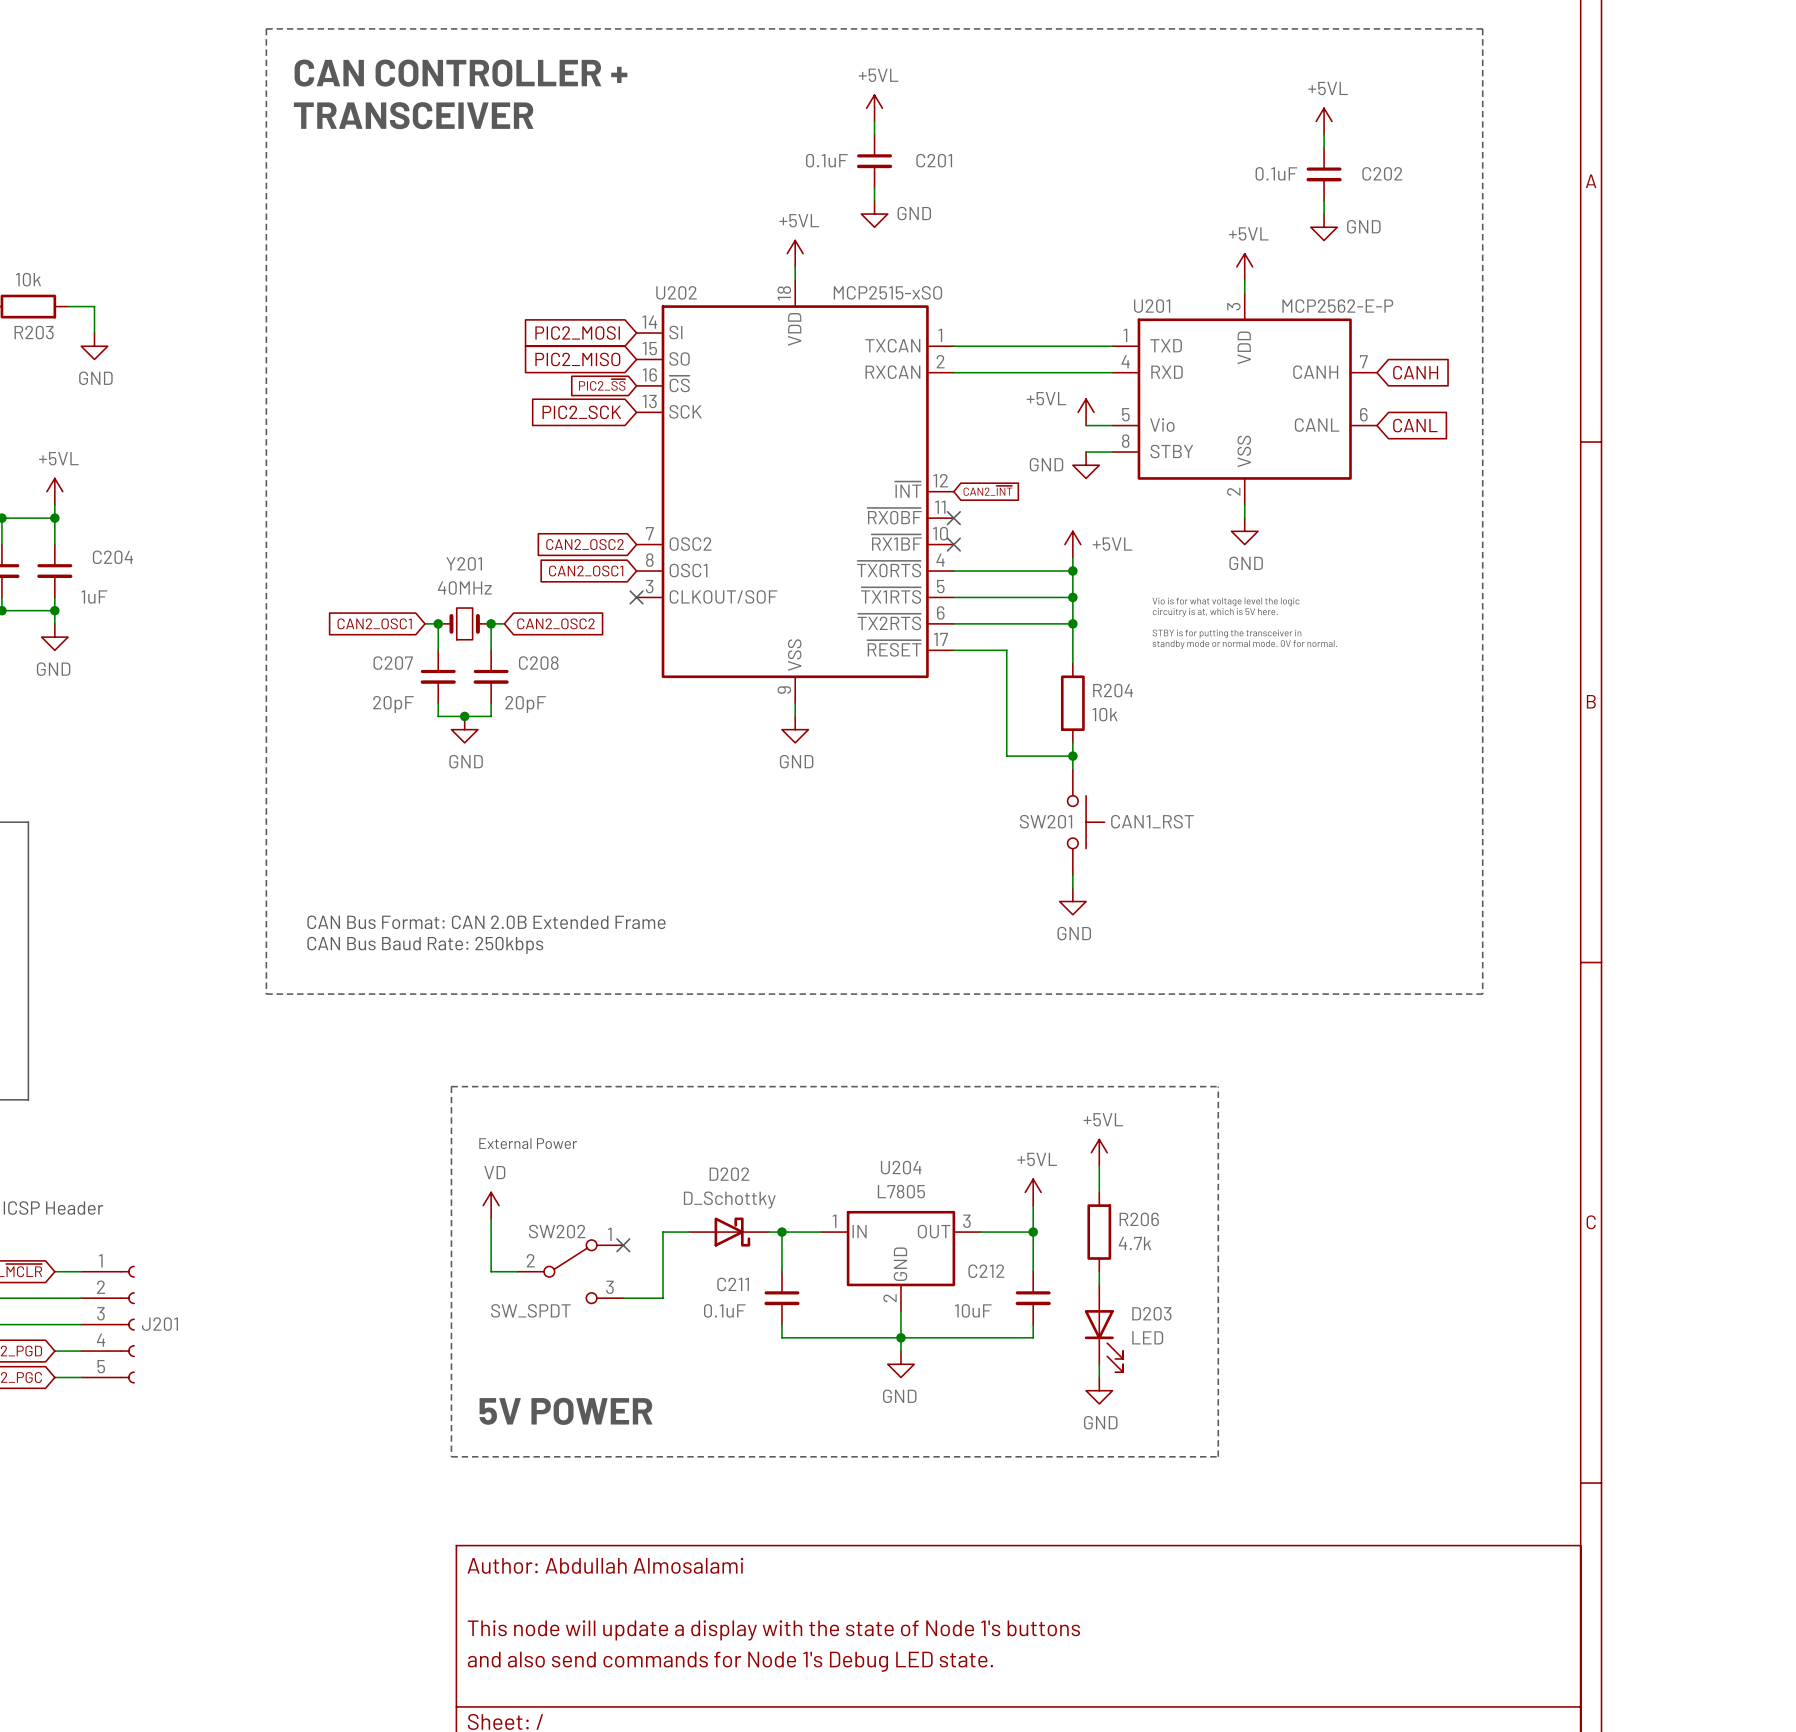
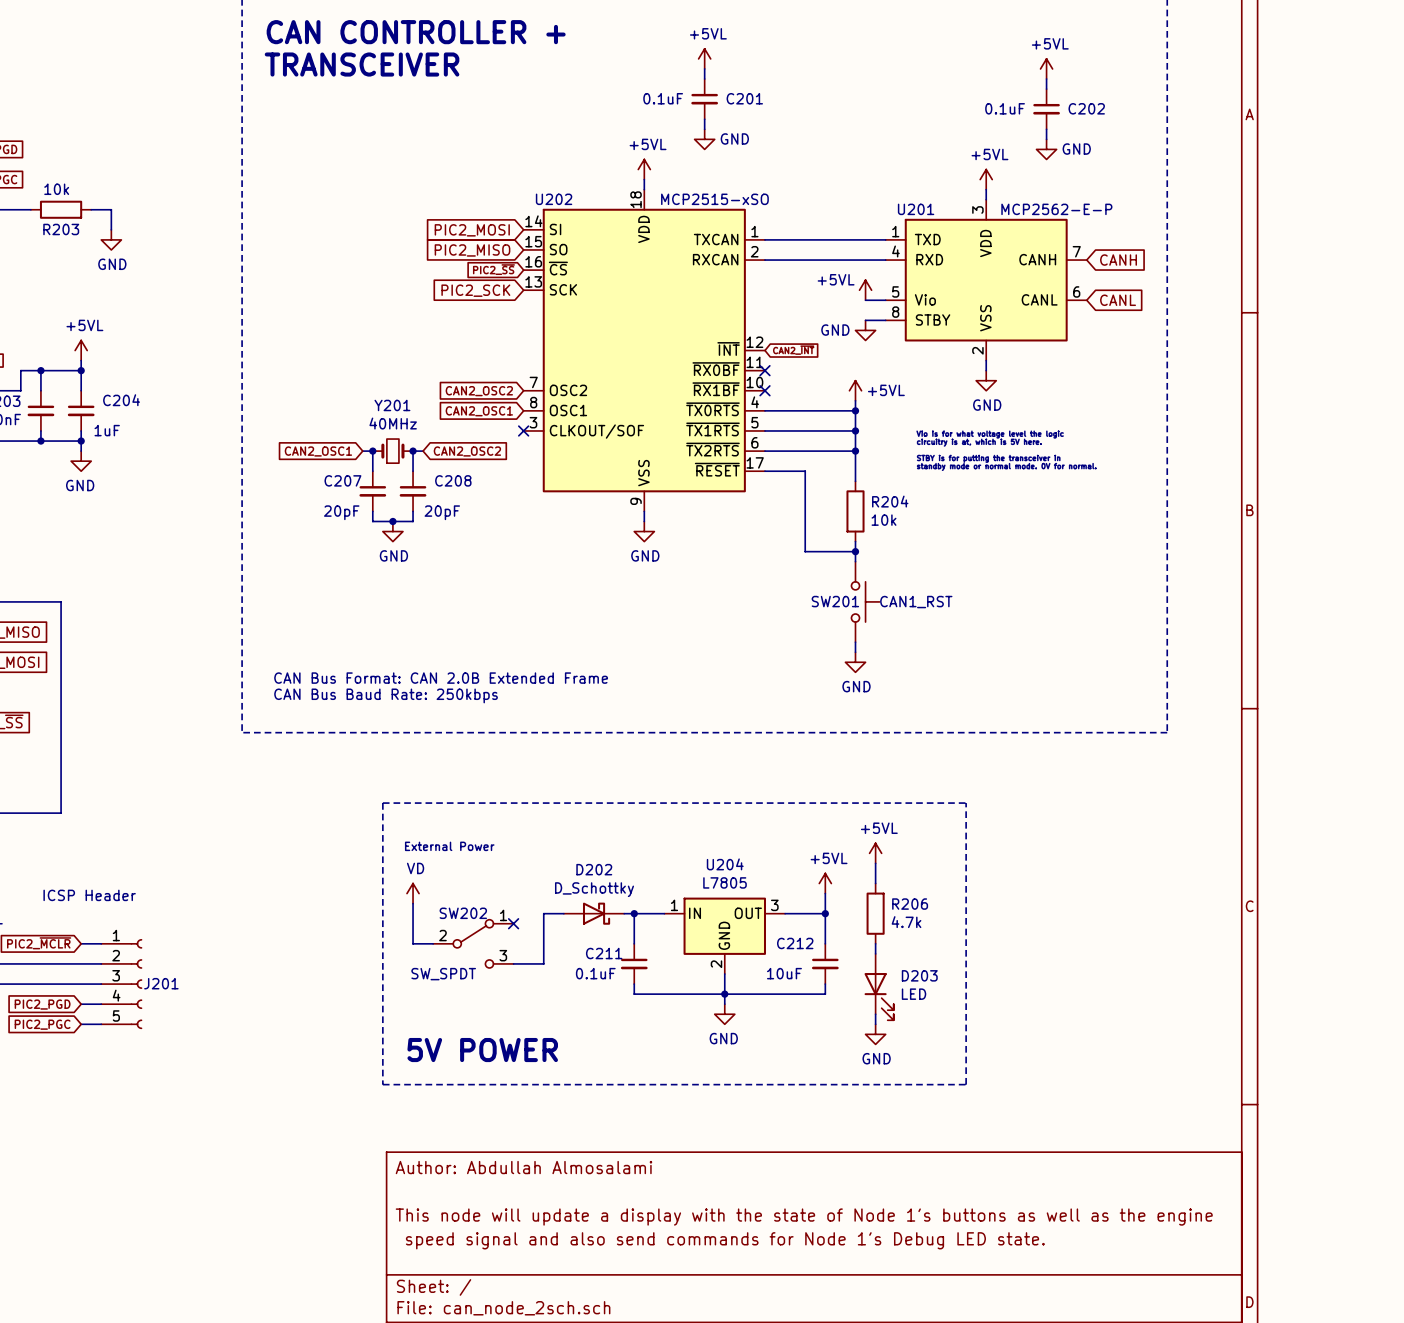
title block: This node will update a display with the state of Node 1's buttons (773, 1630) -> This node will update a display with the state of Node 1's buttons as well as the engine (804, 1217)
title block: and also send commands for Node 1's Debug LED state. (730, 1661) -> speed signal and also send commands for Node 1's Debug LED state. (725, 1240)

